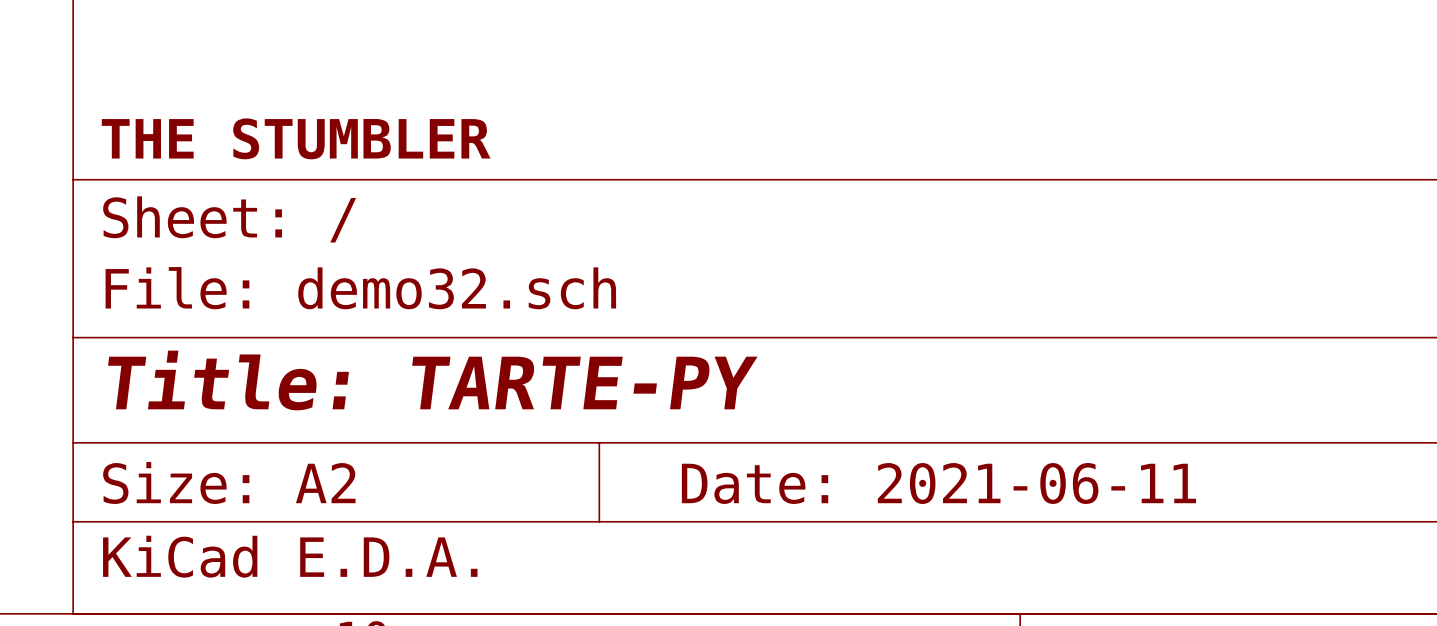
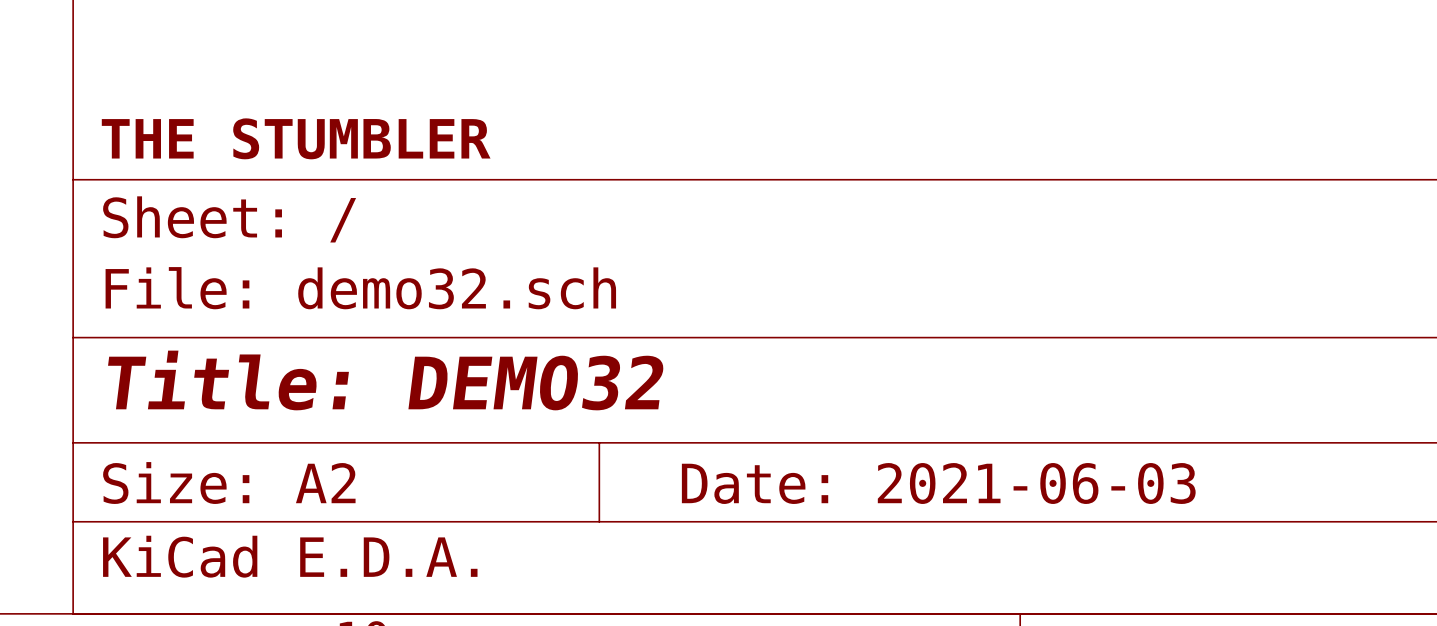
title block: Title: TARTE-PY (432, 380) -> Title: DEMO32 (386, 380)
title block: Date: 2021-06-11 (938, 483) -> Date: 2021-06-03 (938, 483)

